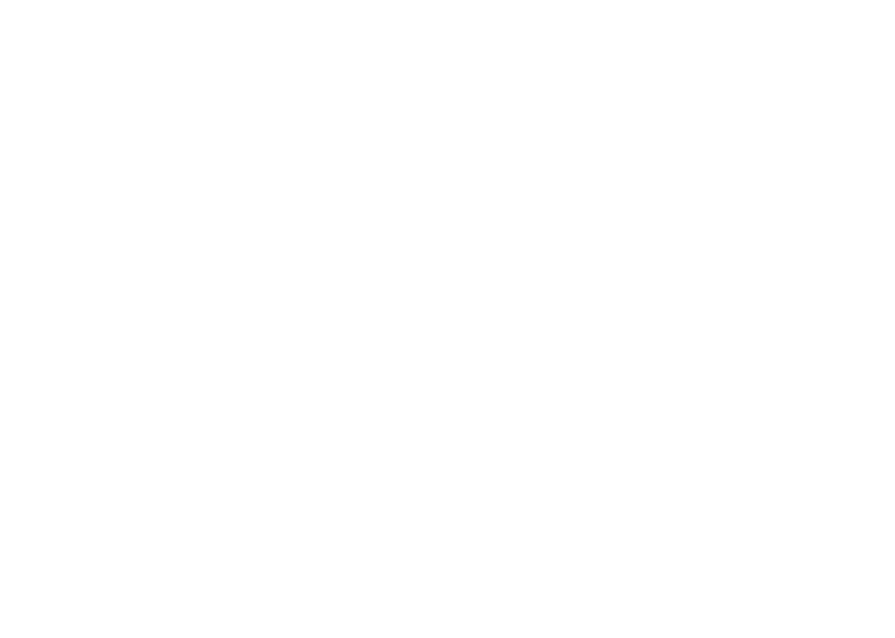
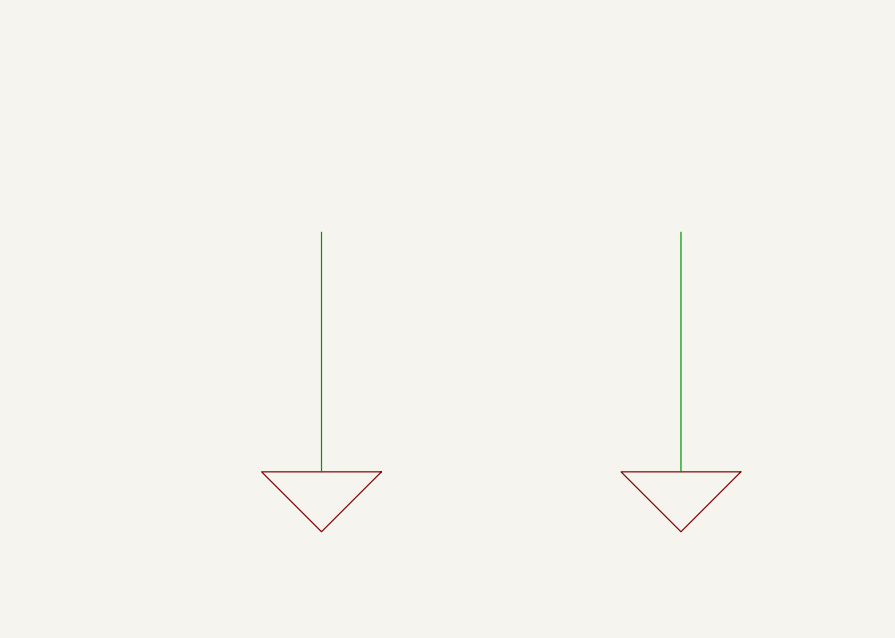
wire: none -> (321, 232) (321, 471)
wire: none -> (680, 232) (680, 471)
power symbol: none -> (321, 501)
power symbol: none -> (680, 501)

